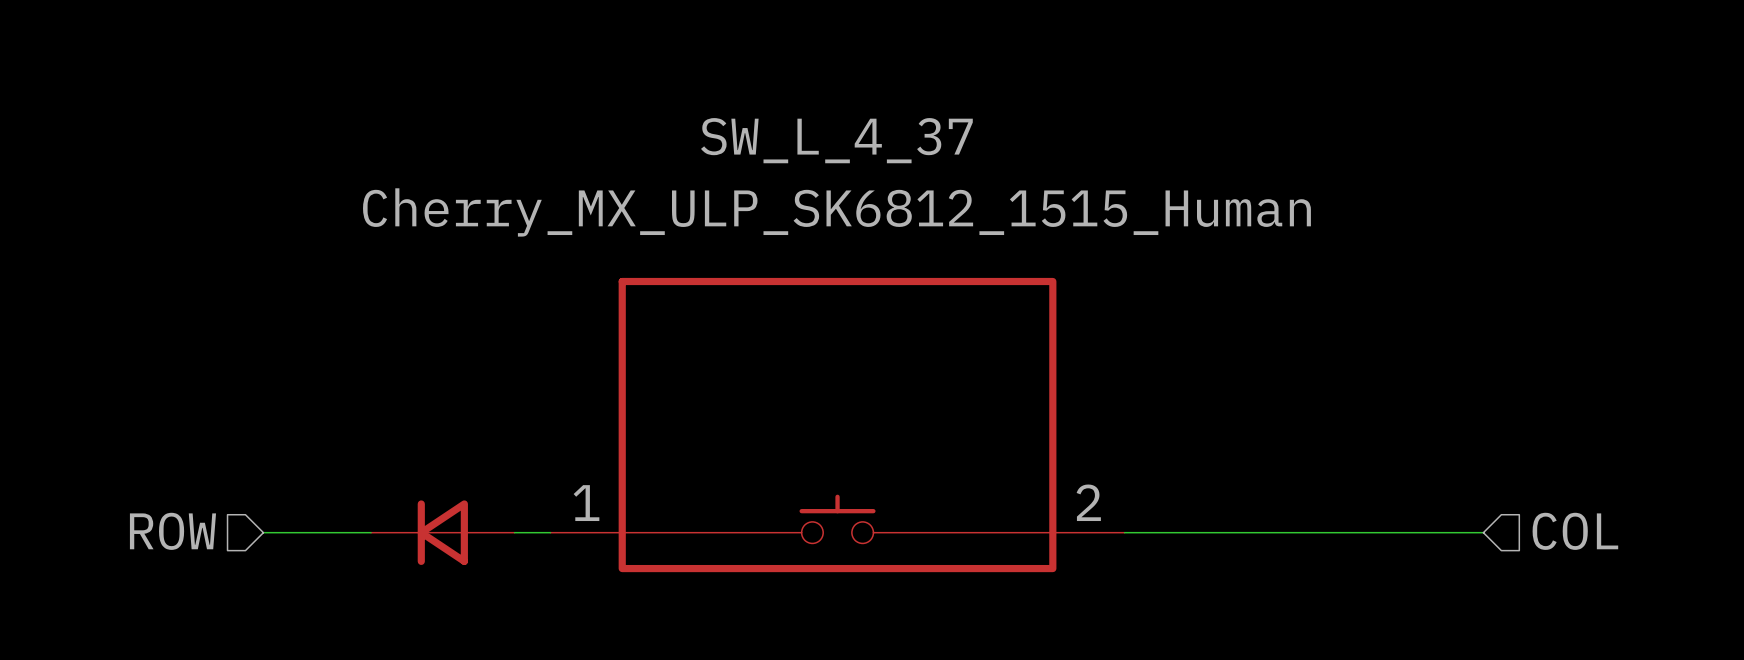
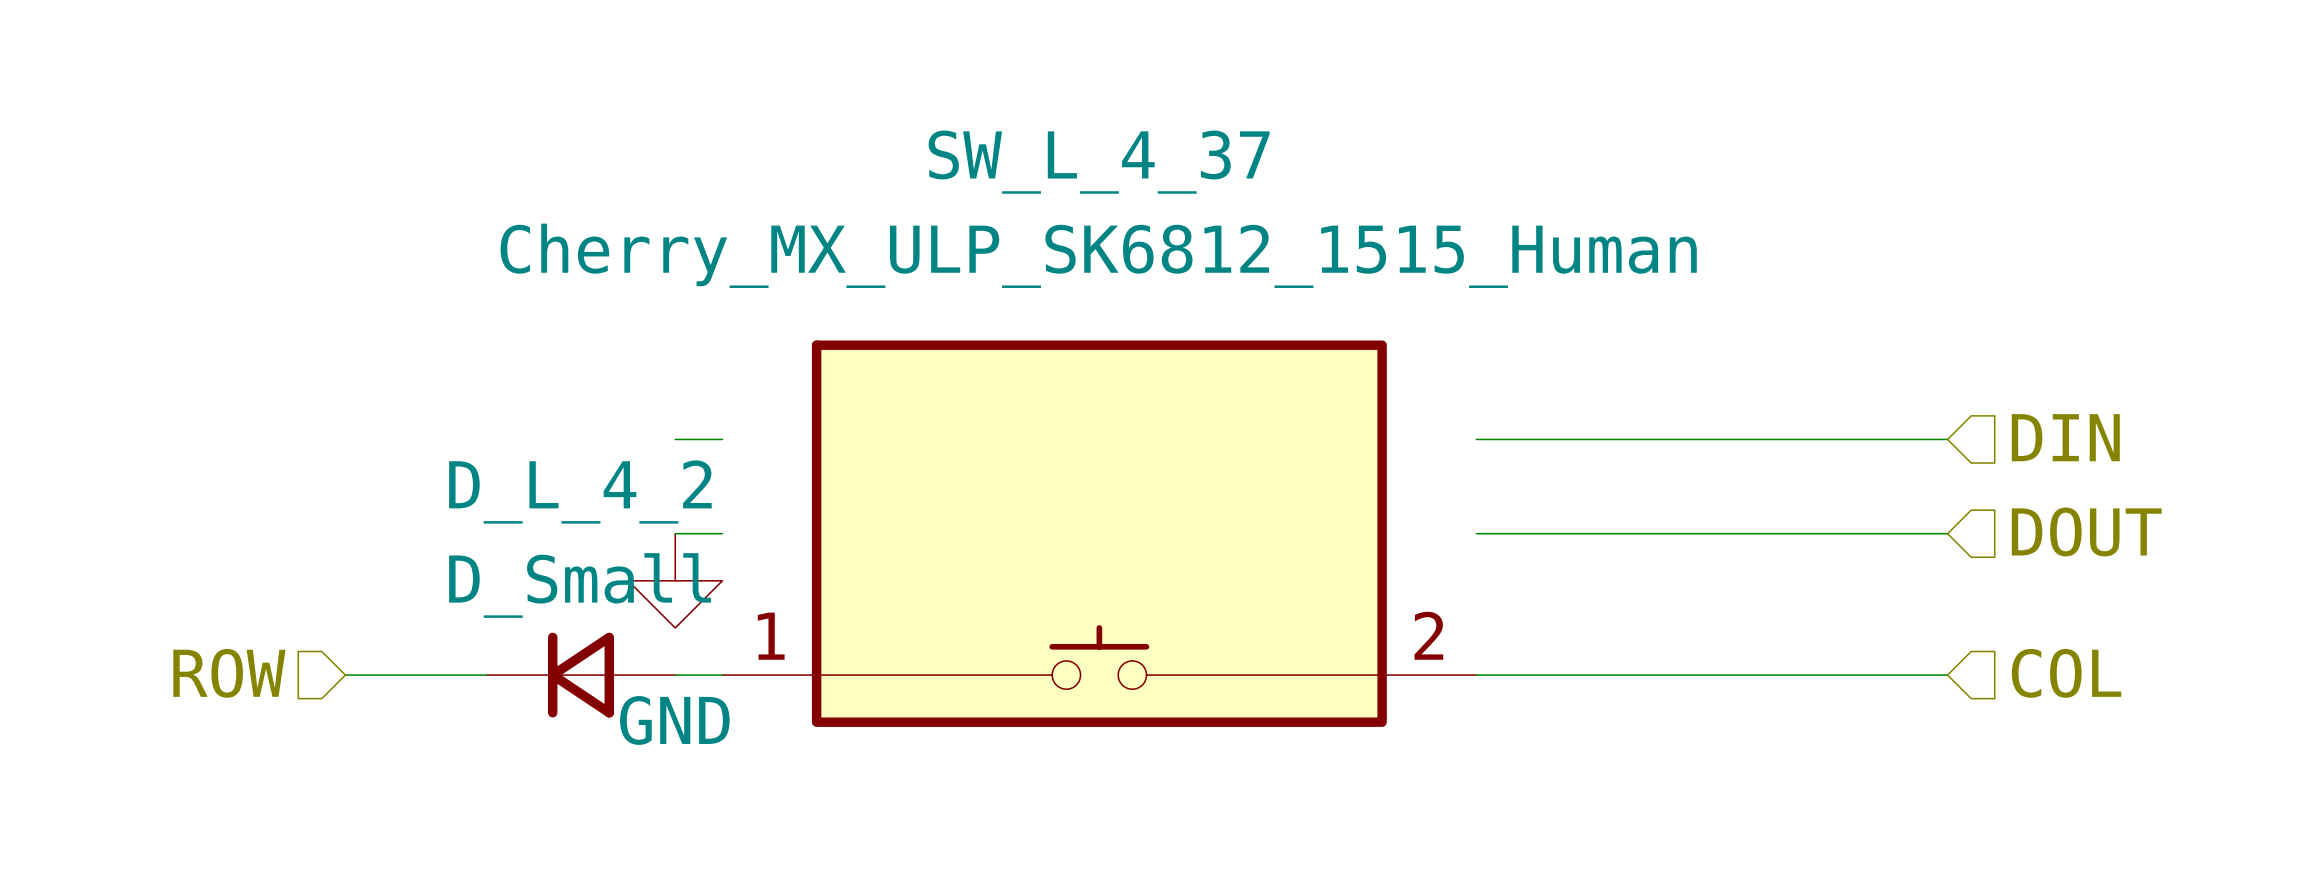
hierarchical label: none -> DIN (2065, 437)
wire: none -> (675, 439) (722, 439)
wire: none -> (1476, 439) (1947, 439)
D_L_4_2 name: none -> D_L_4_2 (580, 492)
hierarchical label: none -> DOUT (2086, 531)
wire: none -> (675, 533) (722, 533)
wire: none -> (1476, 533) (1947, 533)
power symbol: none -> GND (675, 580)
D_L_4_2 value: none -> D_Small (580, 585)

